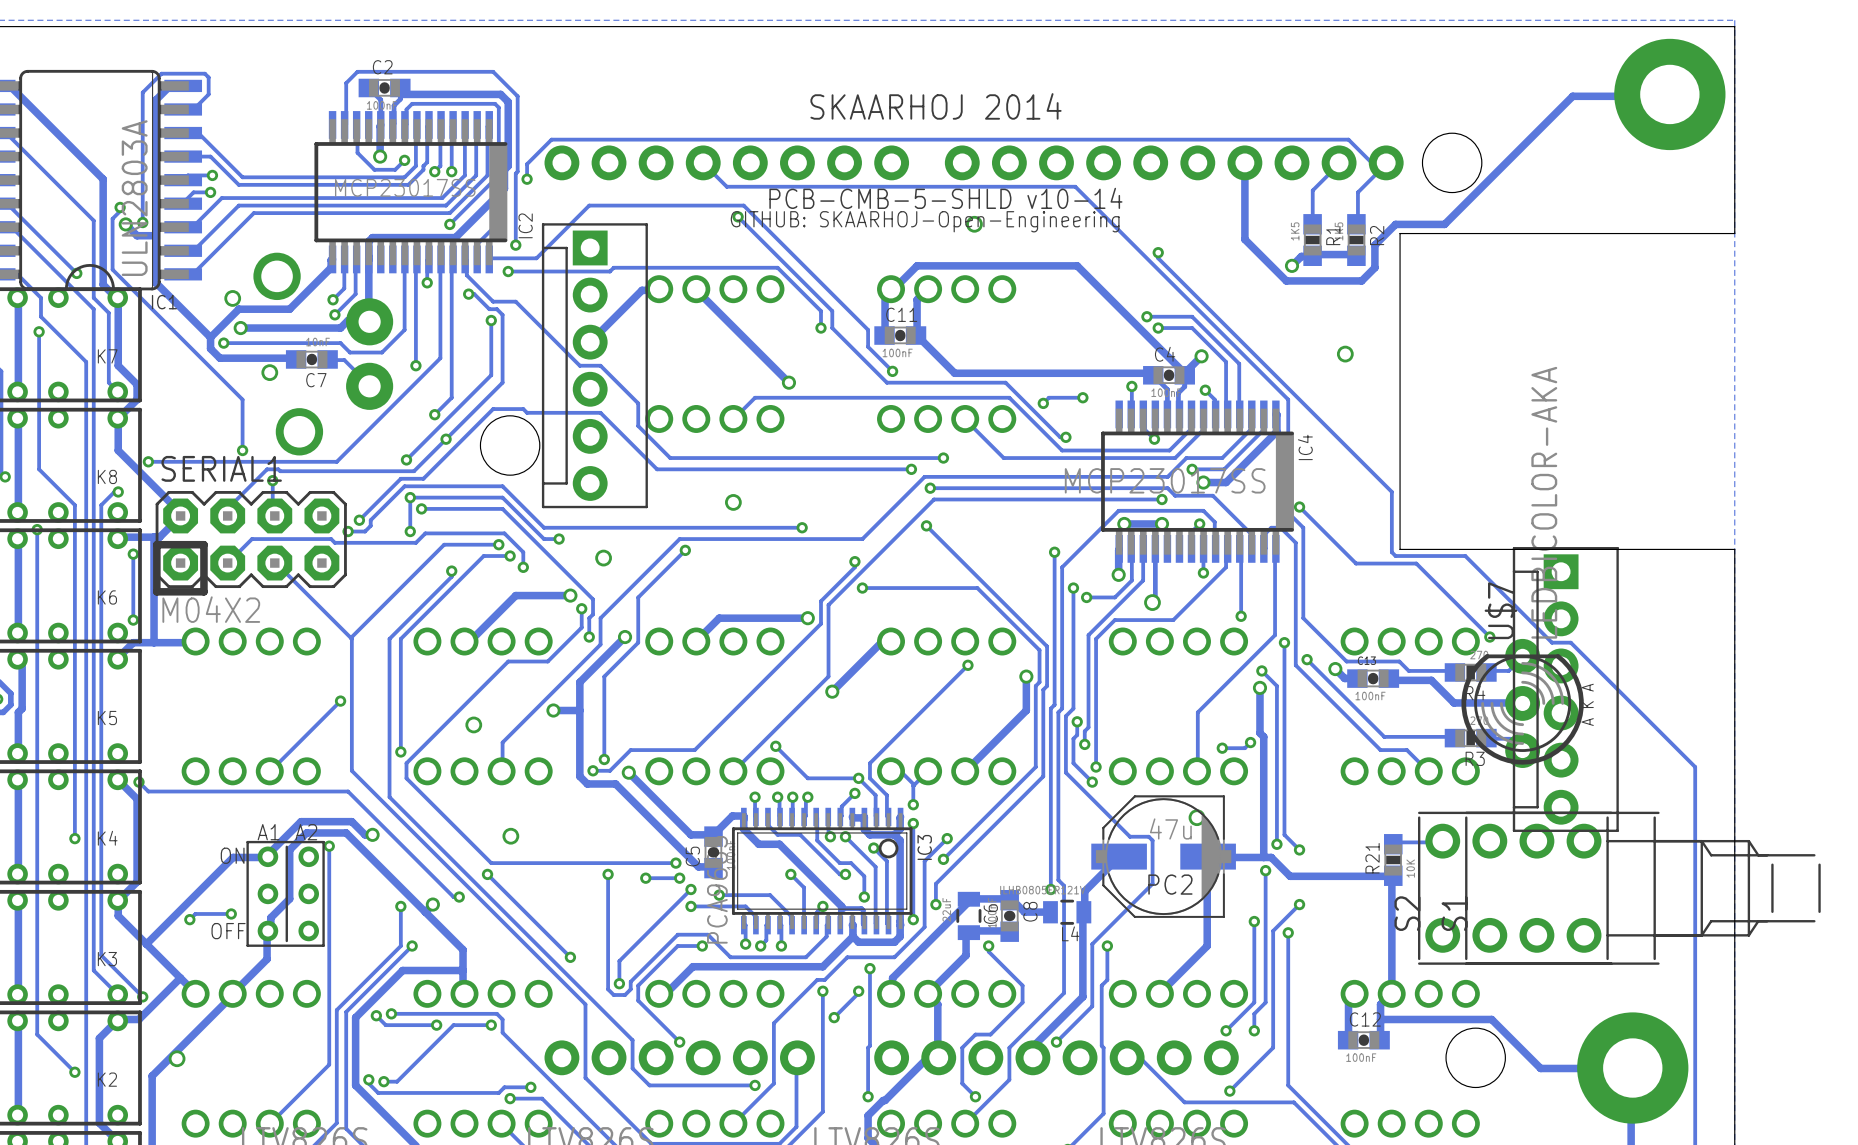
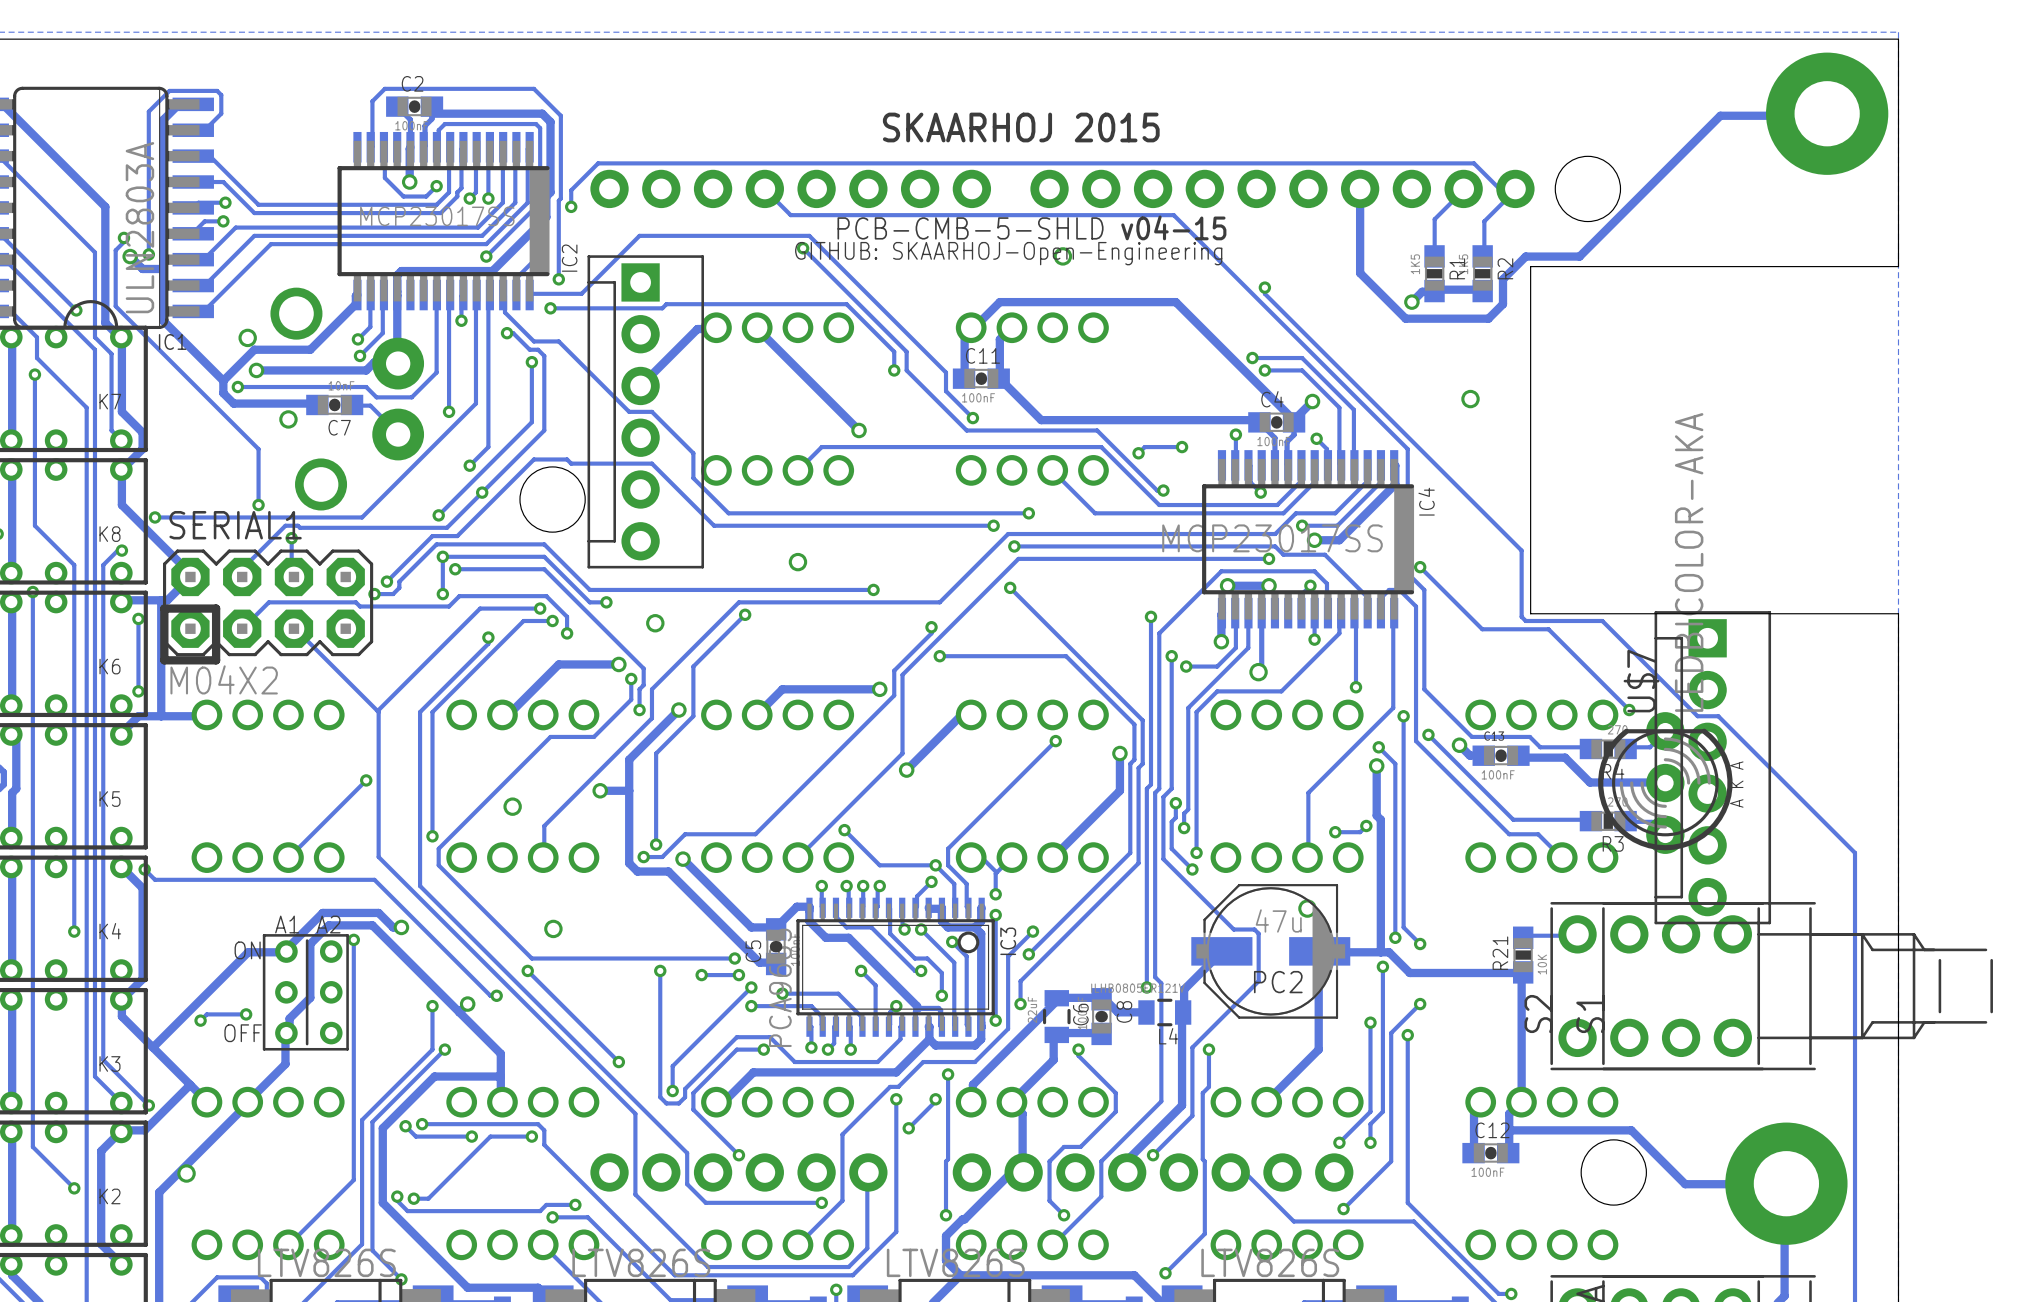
text: SKAARHOJ 2014 (936, 106) -> SKAARHOJ 2015 (1021, 127)
text: v10-14 (1074, 198) -> v04-15 (1173, 227)

